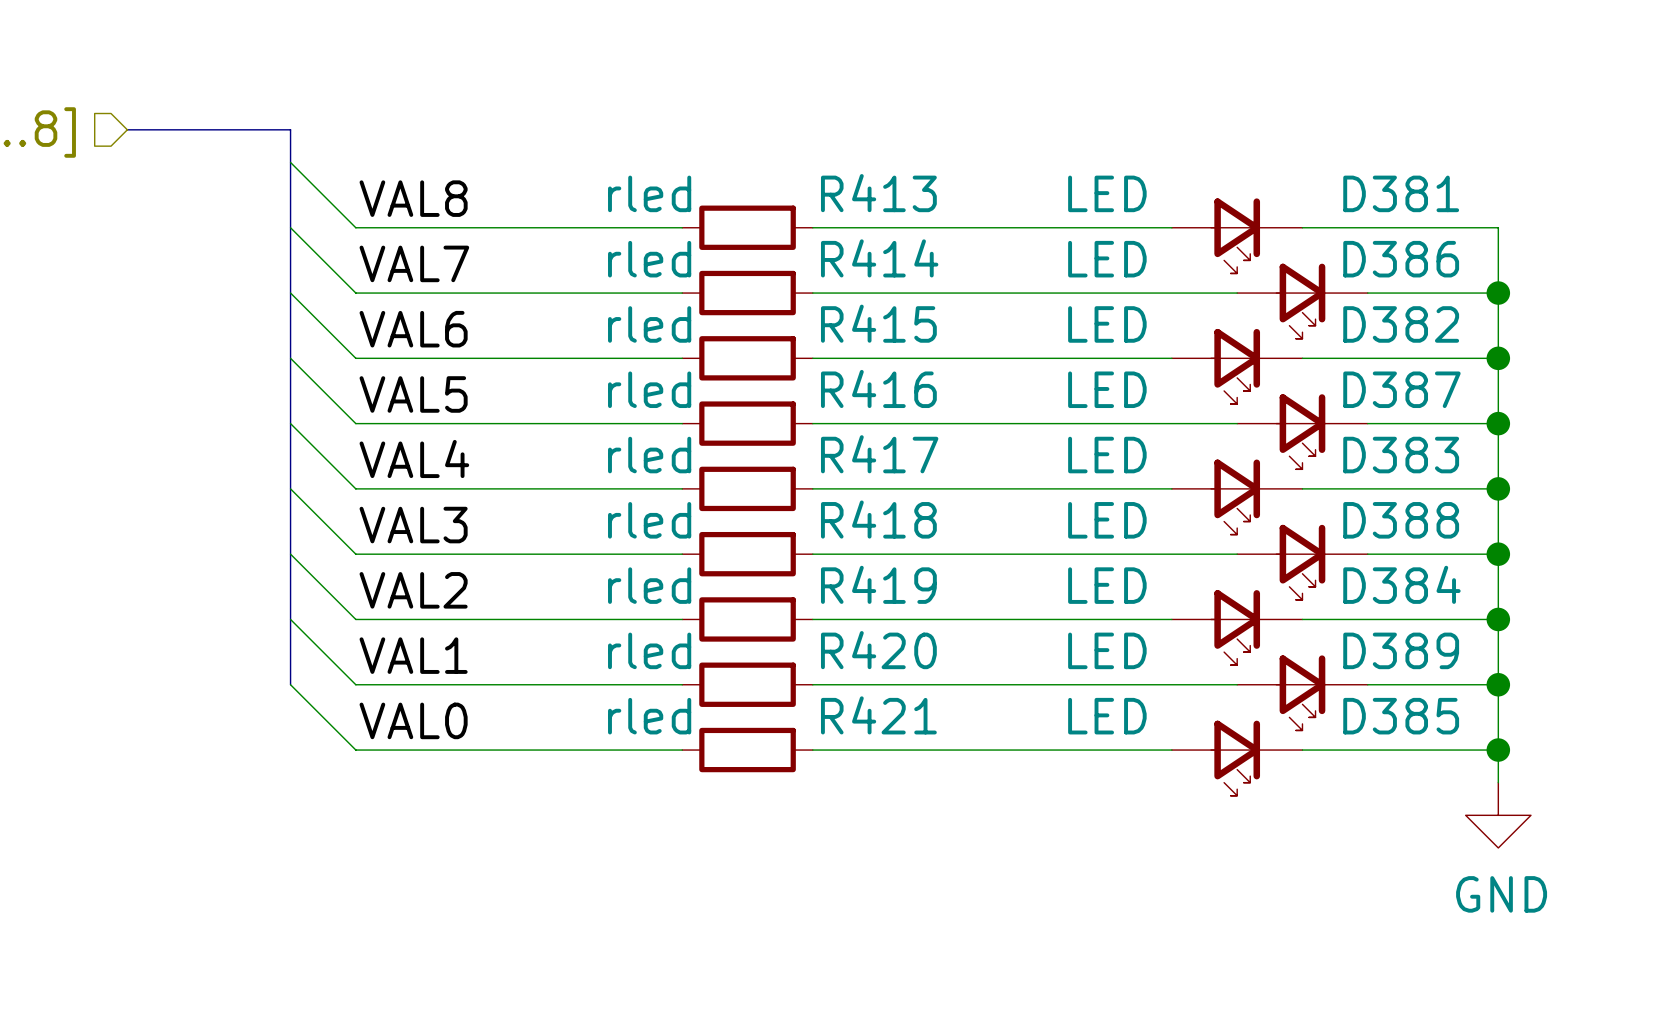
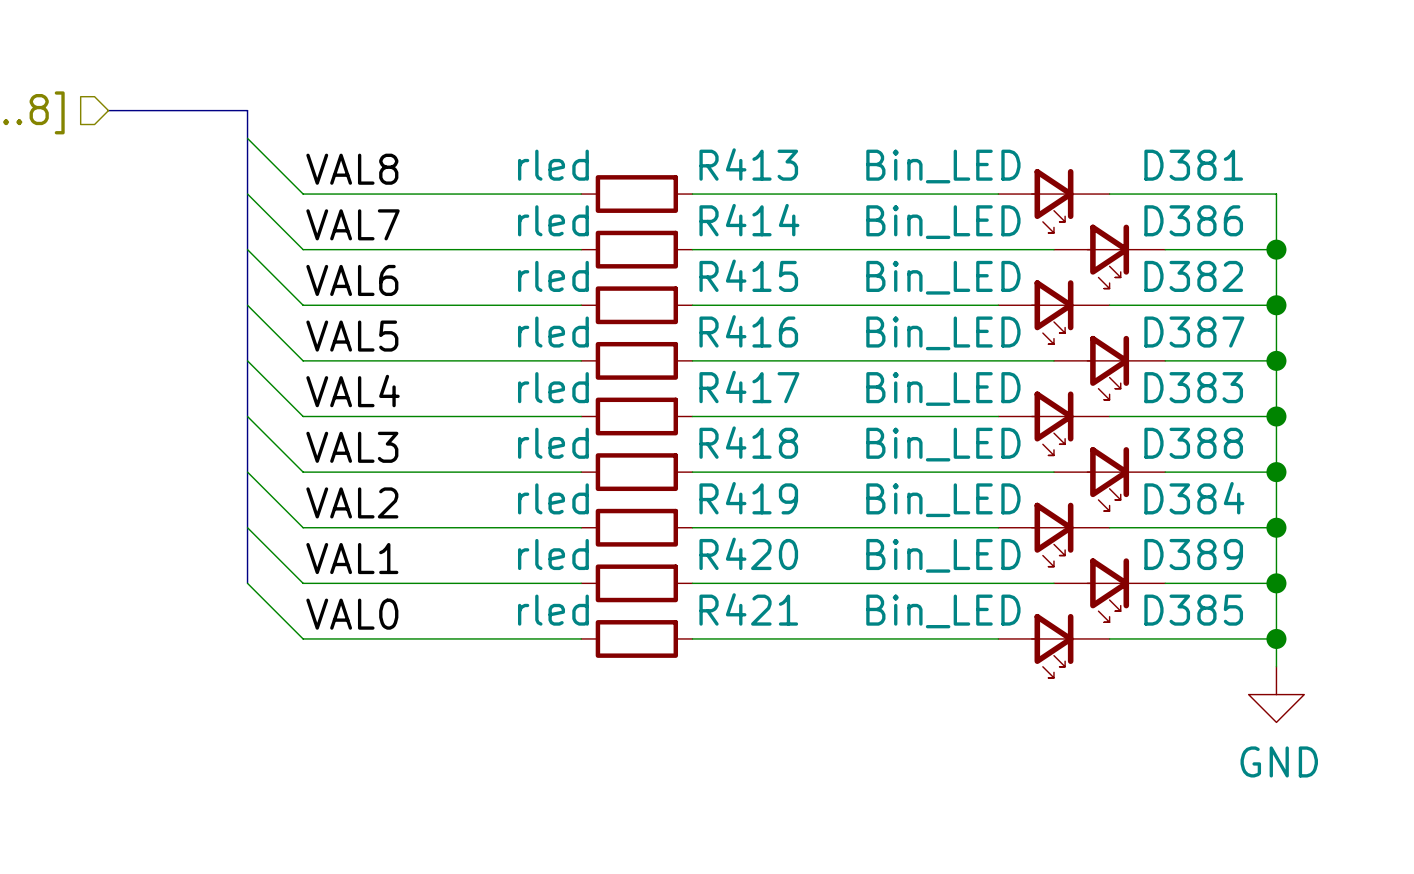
D381 value: LED (1107, 193) -> Bin_LED (943, 166)
D386 value: LED (1107, 259) -> Bin_LED (943, 222)
D382 value: LED (1107, 324) -> Bin_LED (943, 277)
D387 value: LED (1107, 389) -> Bin_LED (943, 333)
D383 value: LED (1107, 455) -> Bin_LED (943, 388)
D388 value: LED (1107, 520) -> Bin_LED (943, 444)
D384 value: LED (1107, 585) -> Bin_LED (943, 500)
D389 value: LED (1107, 650) -> Bin_LED (943, 555)
D385 value: LED (1107, 716) -> Bin_LED (943, 611)

